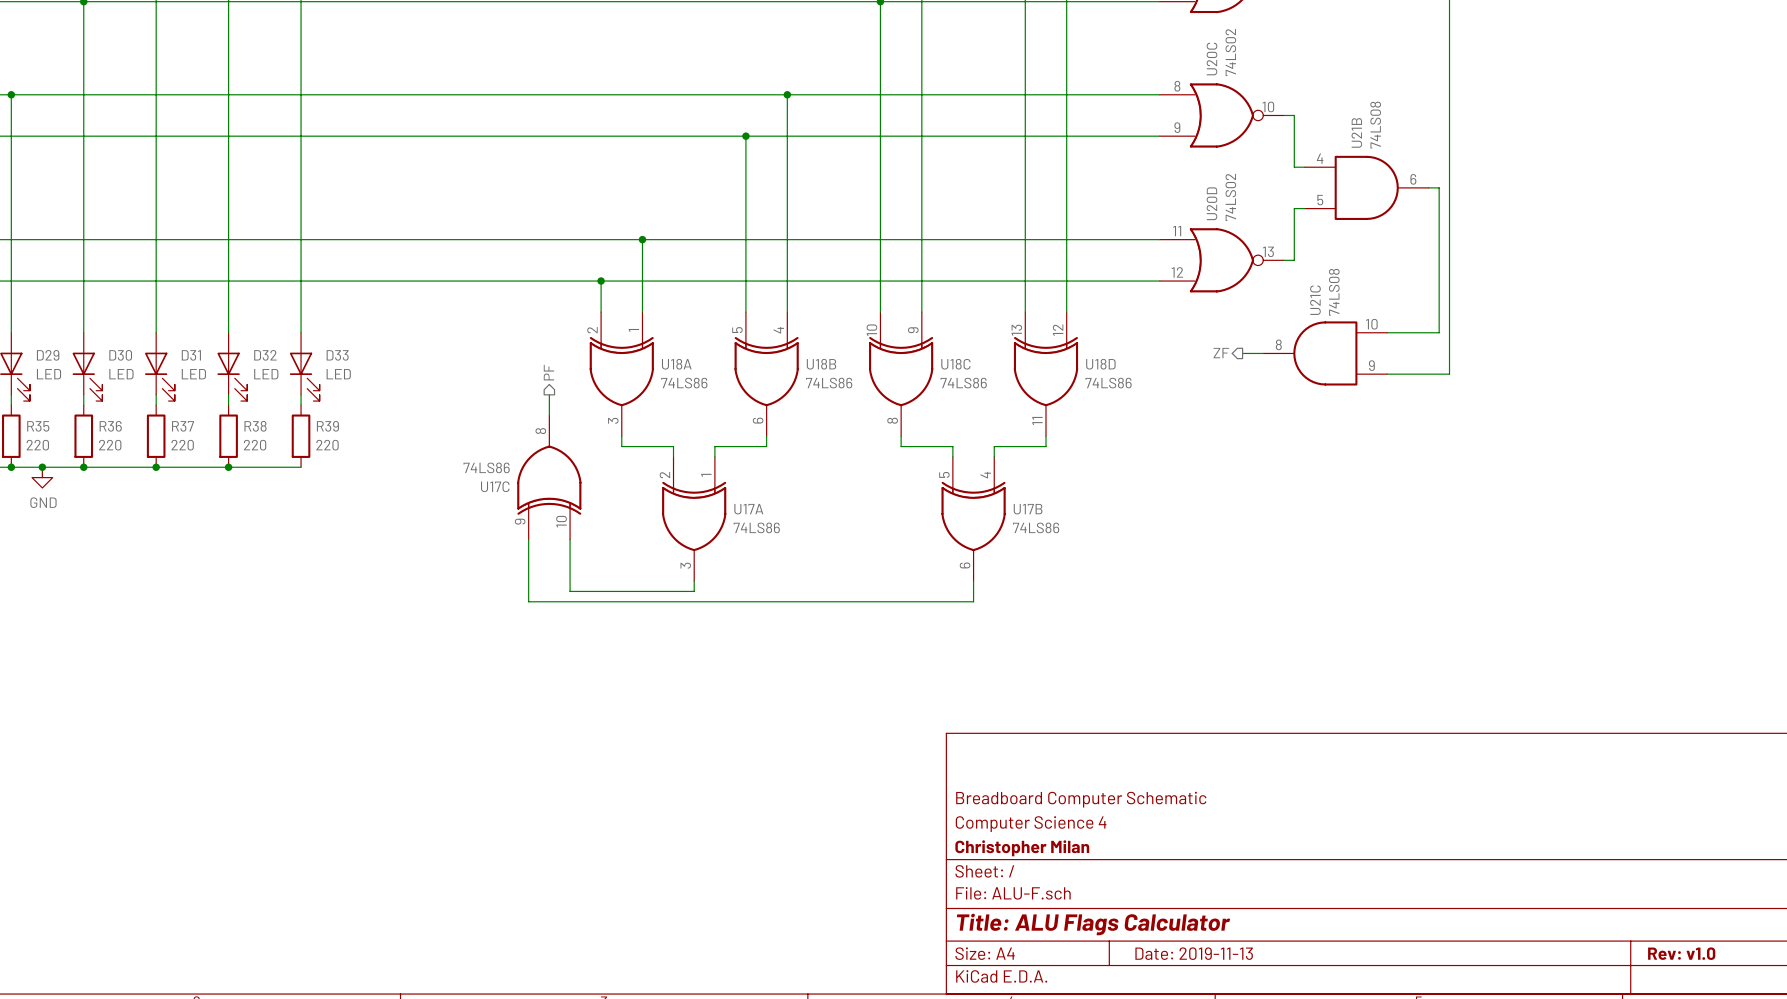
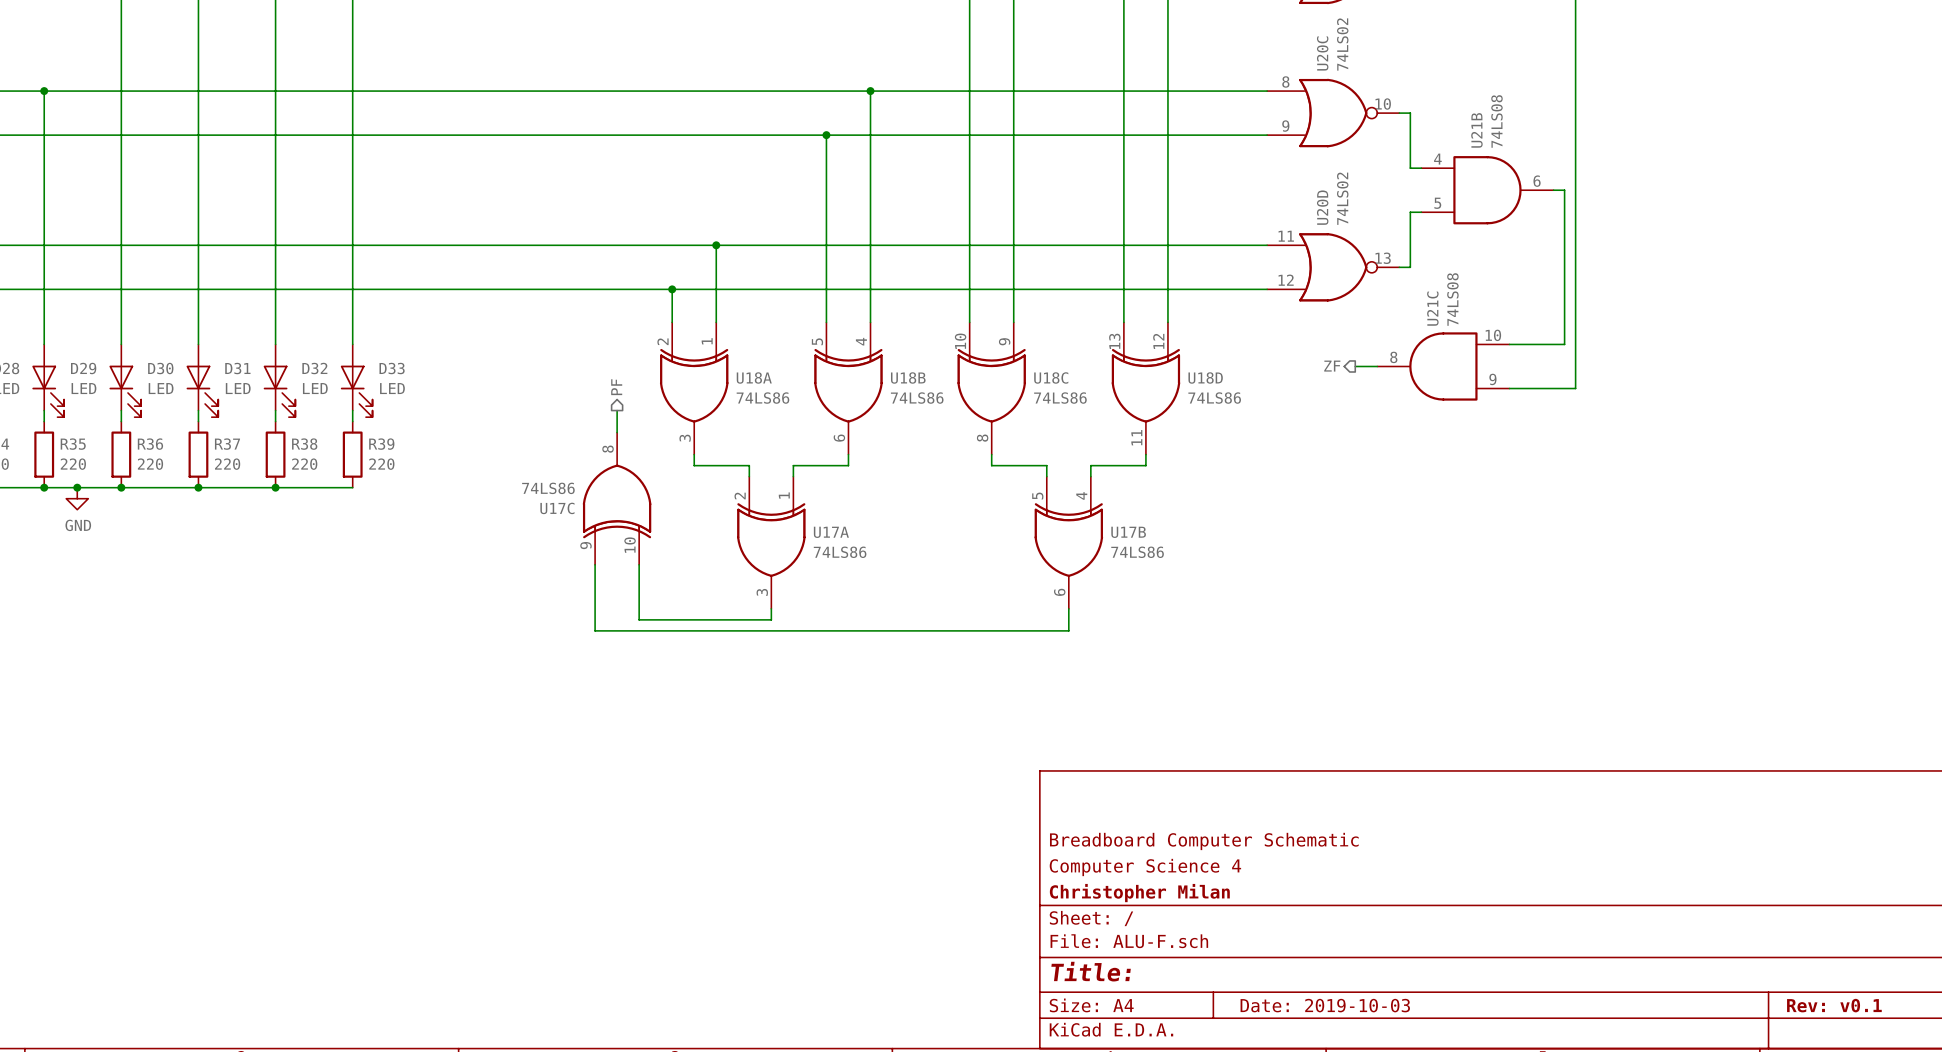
title block: Title: ALU Flags Calculator (1093, 924) -> Title: (1091, 971)
title block: Date: 2019-11-13 (1194, 953) -> Date: 2019-10-03 (1325, 1005)
title block: Rev: v1.0 (1681, 953) -> Rev: v0.1 (1834, 1005)

